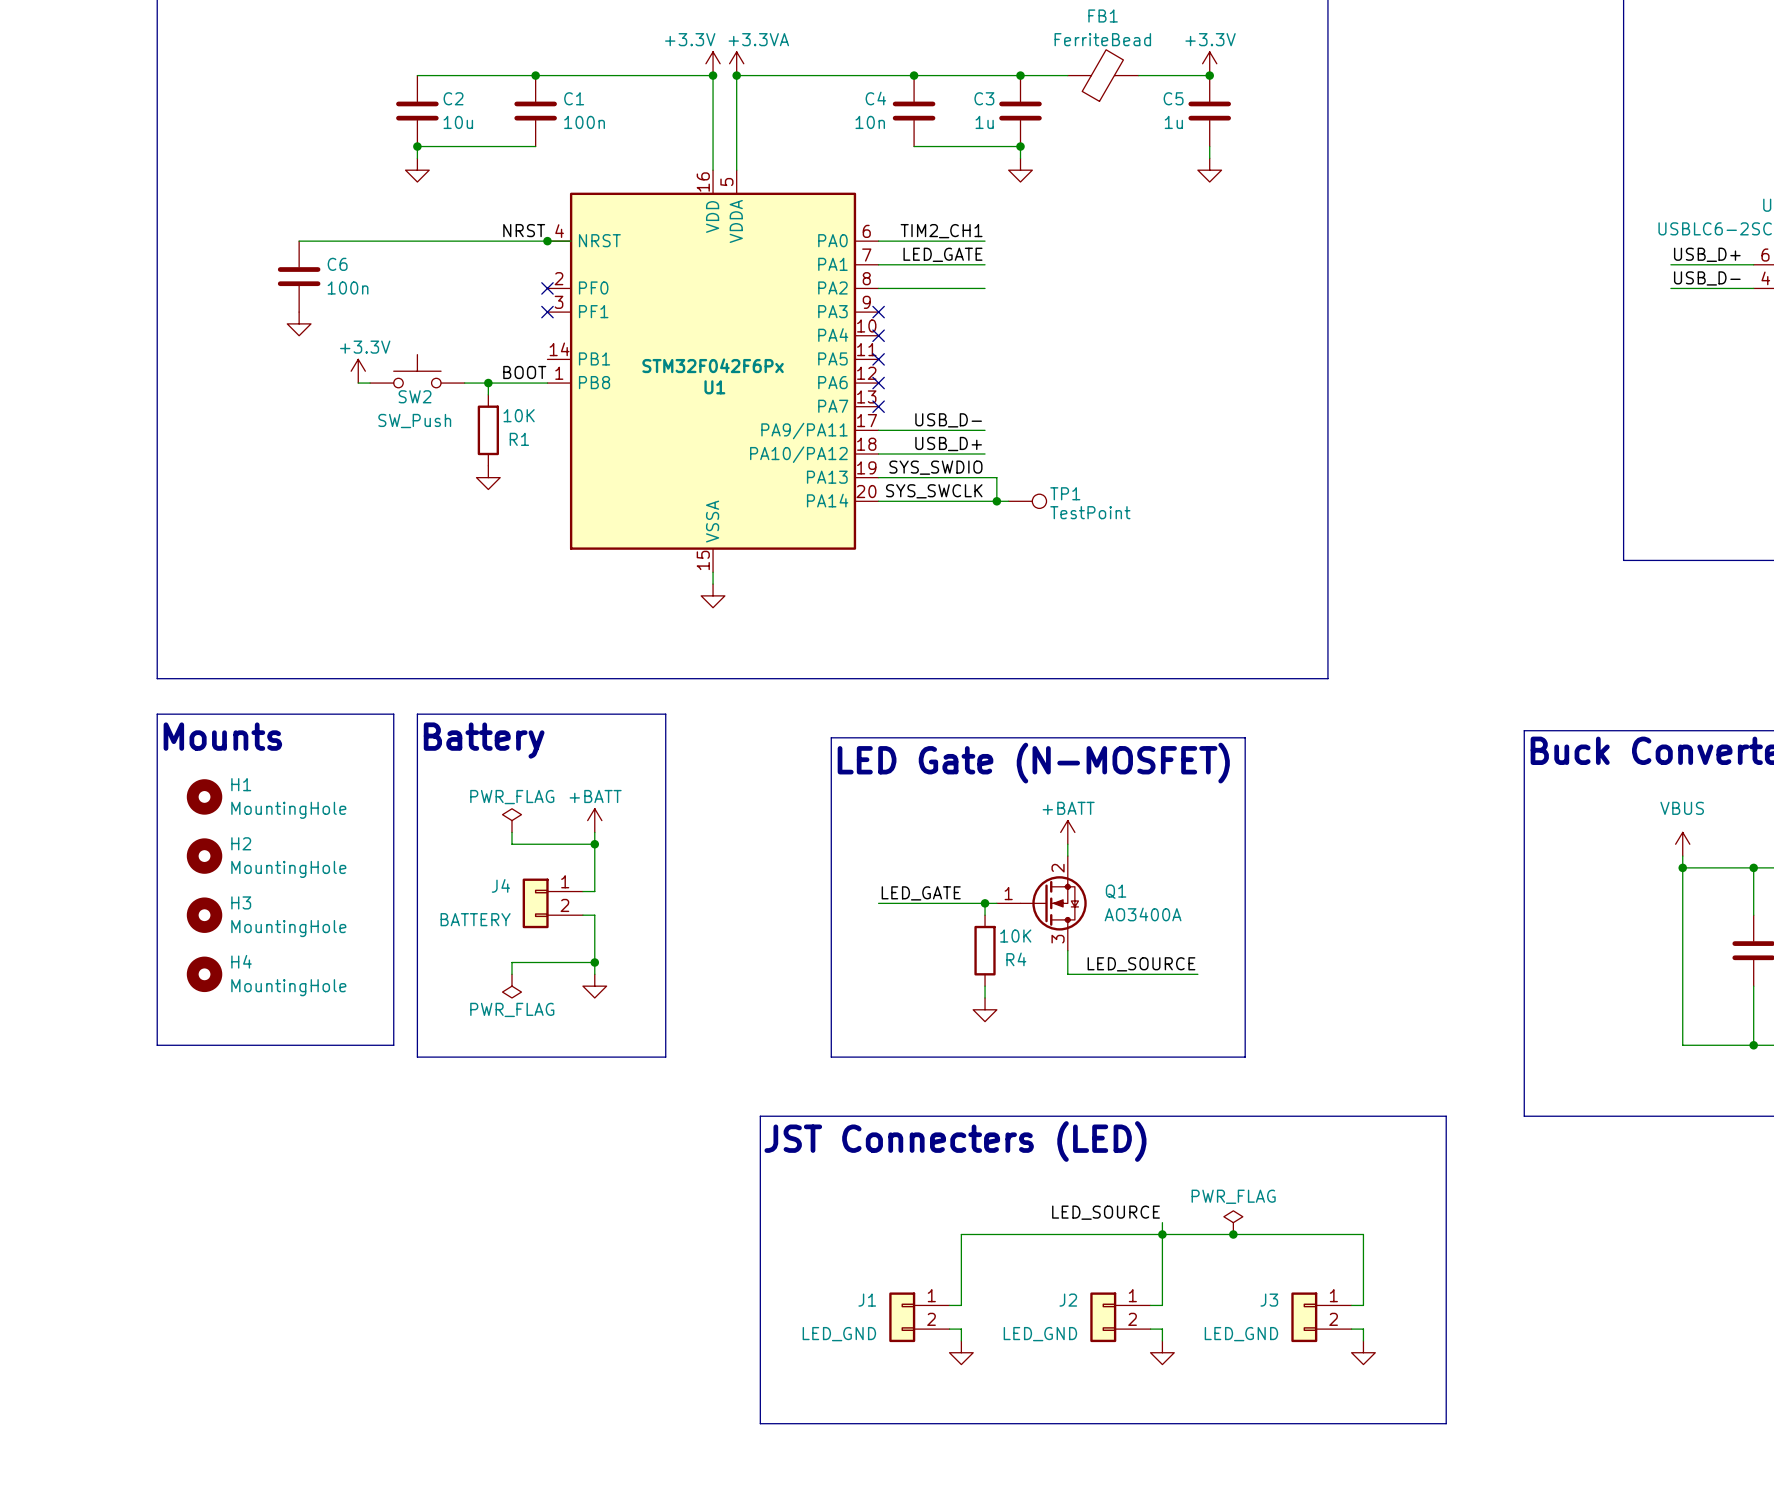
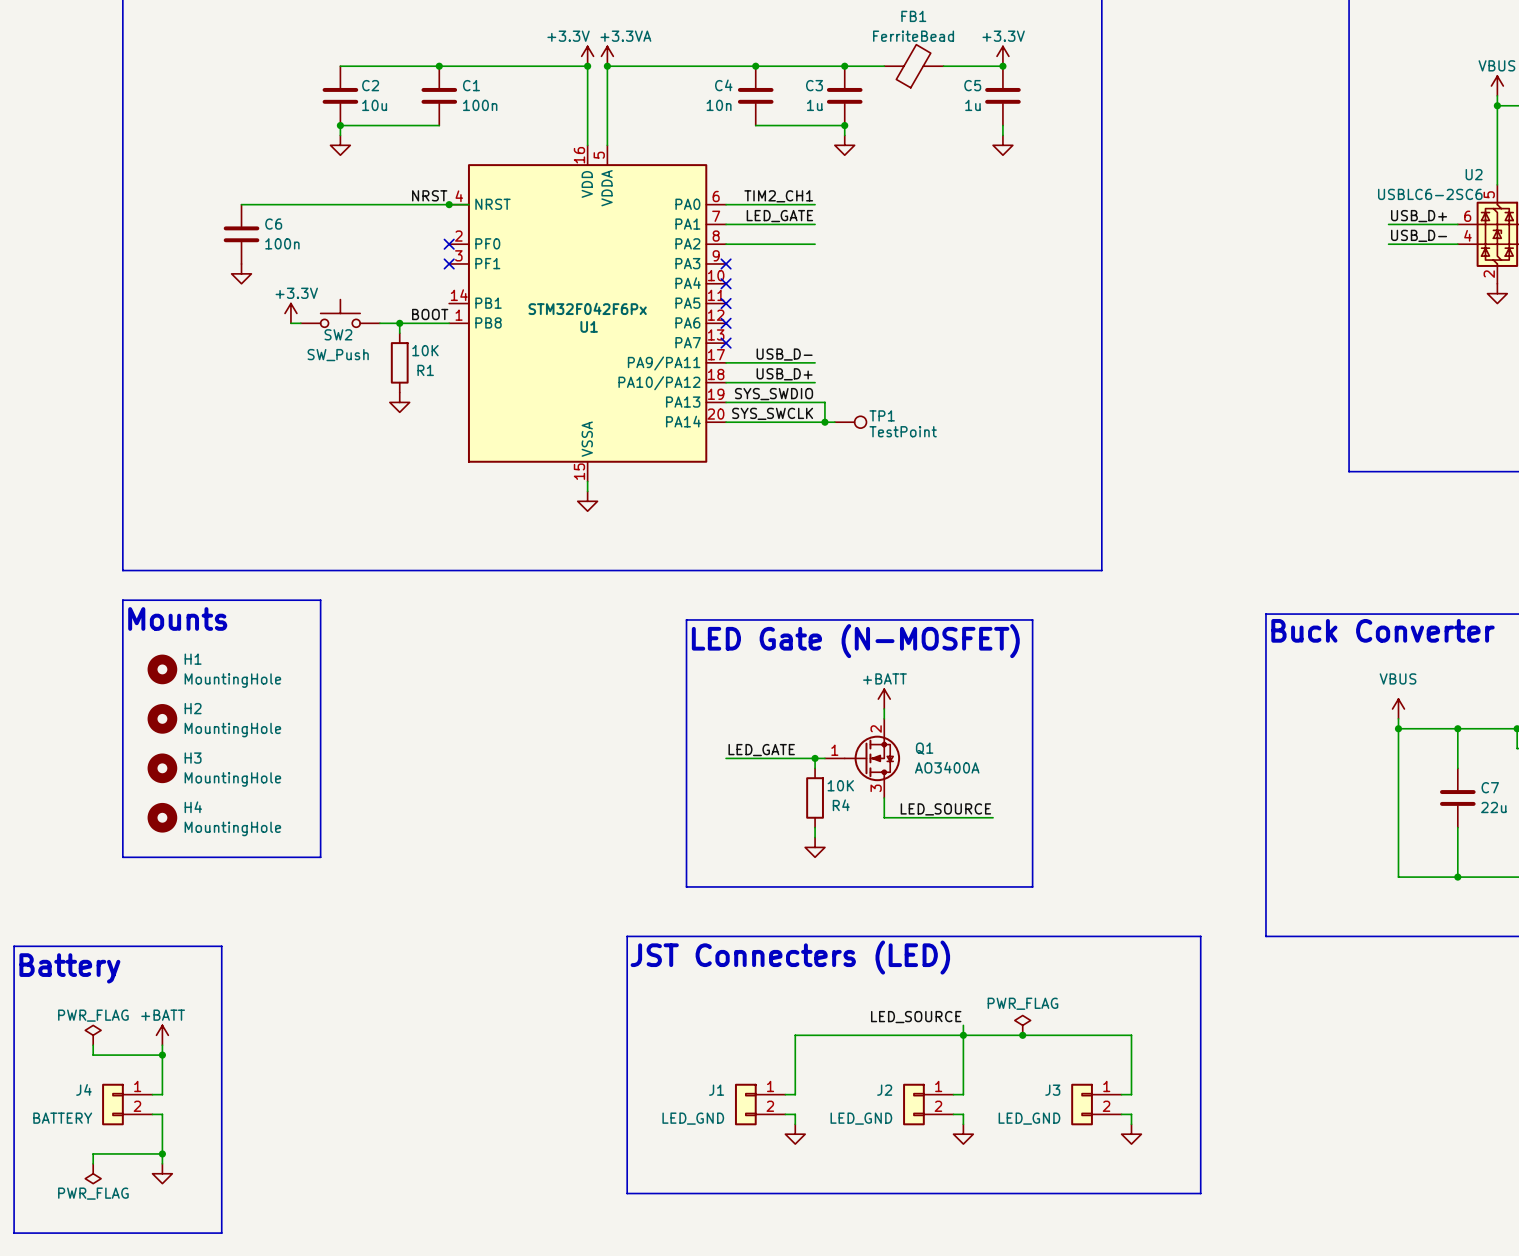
line: (417, 714) (665, 714) (665, 1057) (417, 1057) (417, 714) -> none
text: Battery (484, 740) -> none
power symbol: PWR_FLAG (511, 820) -> none
power symbol: +BATT (594, 820) -> none
wire: (511, 832) (511, 844) (594, 844) -> none
wire: (594, 832) (594, 891) (582, 891) -> none
junction: (594, 844) -> none
J4 position: (552, 903) -> (127, 1104)
wire: (582, 915) (594, 915) (594, 974) -> none
wire: (594, 962) (511, 962) (511, 974) -> none
junction: (594, 962) -> none
power symbol: PWR_FLAG (511, 986) -> none
power symbol: (594, 986) -> none
line: (157, 1021) (157, 1045) (393, 1045) (393, 1021) -> (122, 857) (320, 857)
line: none -> (14, 946) (221, 946) (221, 1233) (14, 1233) (14, 946)
text: none -> Battery (69, 968)
power symbol: none -> PWR_FLAG (93, 1035)
power symbol: none -> +BATT (162, 1035)
wire: none -> (93, 1045) (93, 1055) (162, 1055)
wire: none -> (162, 1045) (162, 1094) (152, 1094)
junction: none -> (162, 1055)
wire: none -> (152, 1114) (162, 1114) (162, 1163)
wire: none -> (162, 1153) (93, 1153) (93, 1163)
junction: none -> (162, 1153)
power symbol: none -> PWR_FLAG (93, 1173)
power symbol: none -> (162, 1173)

